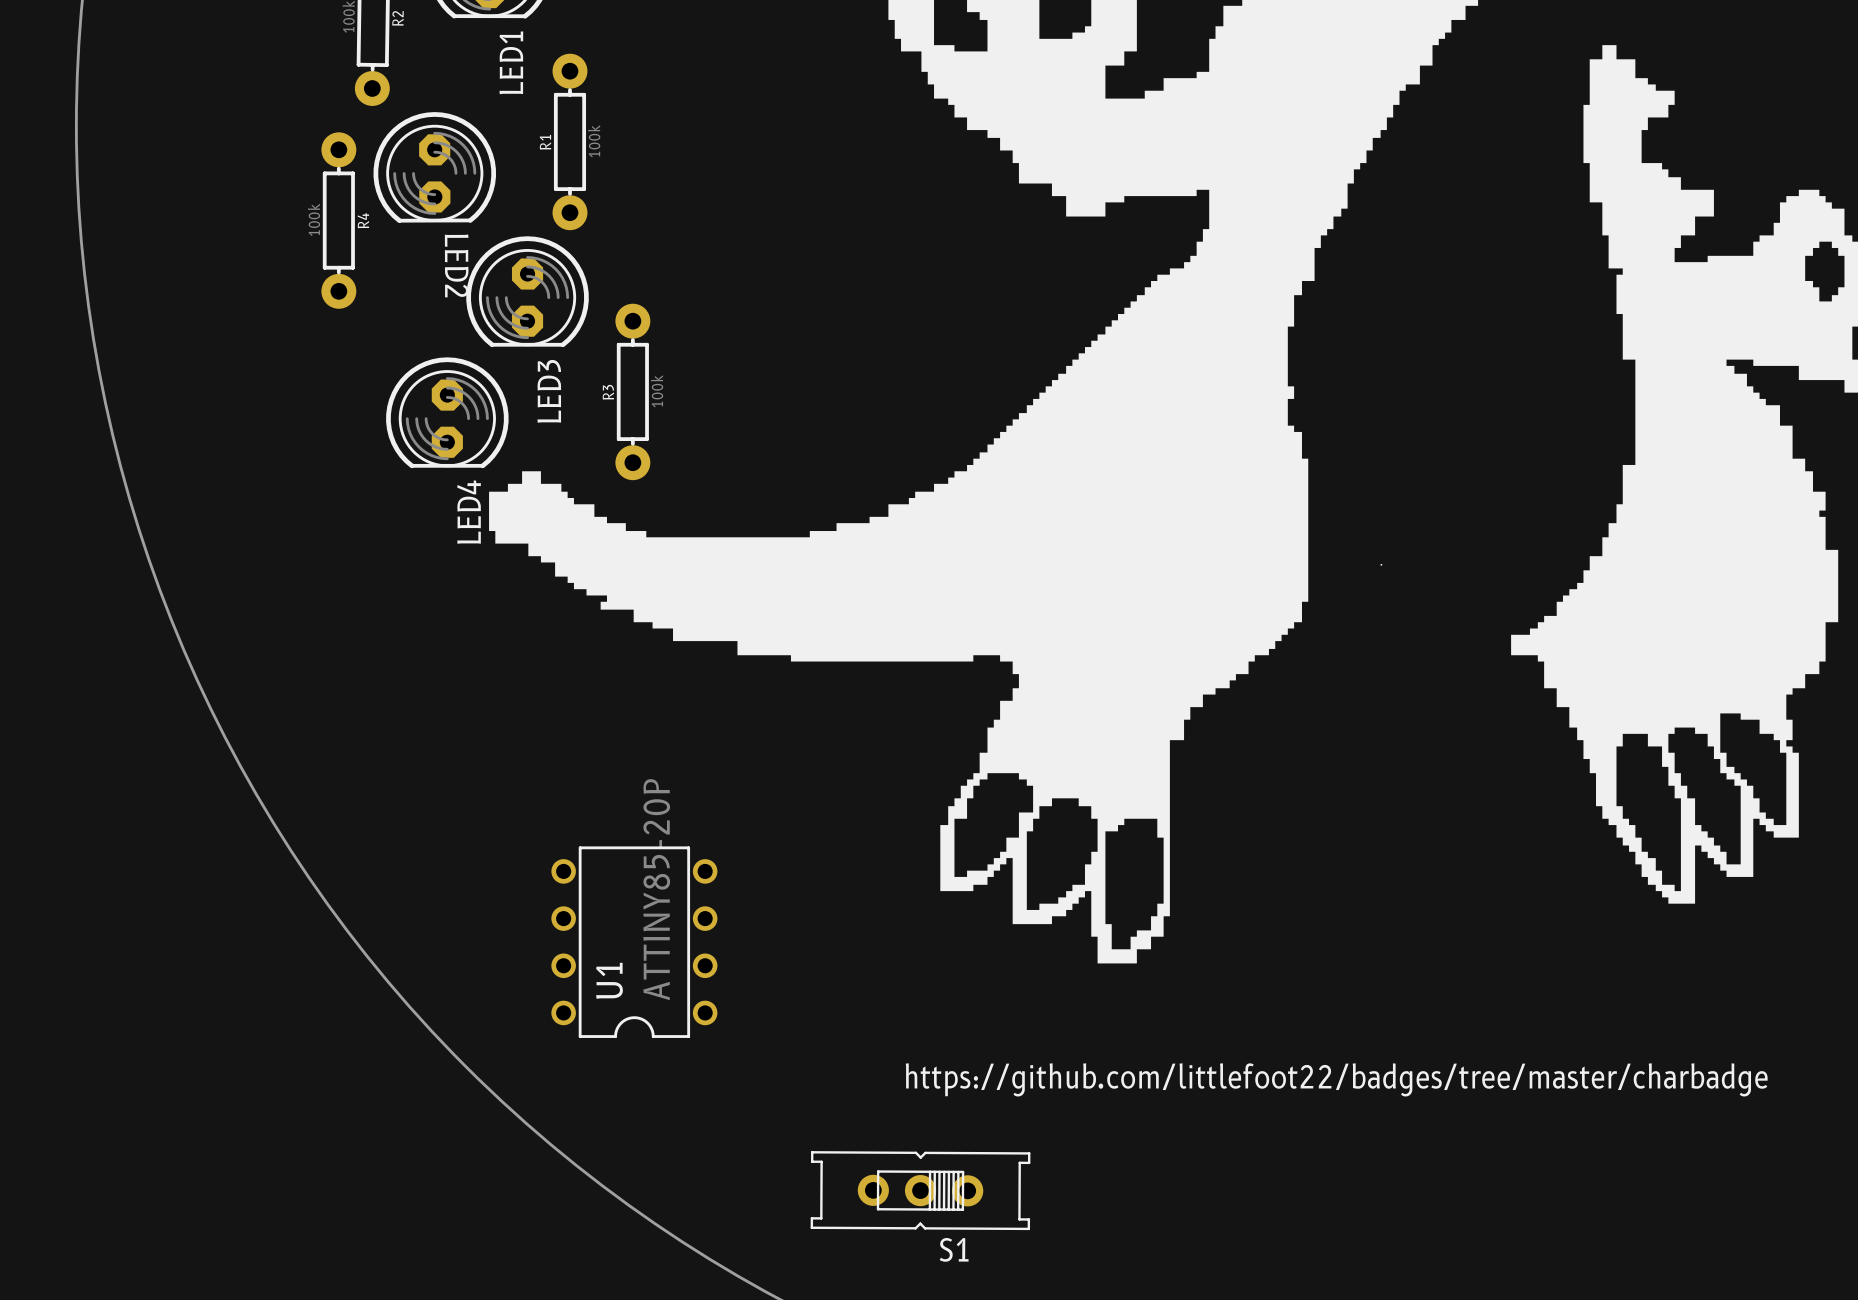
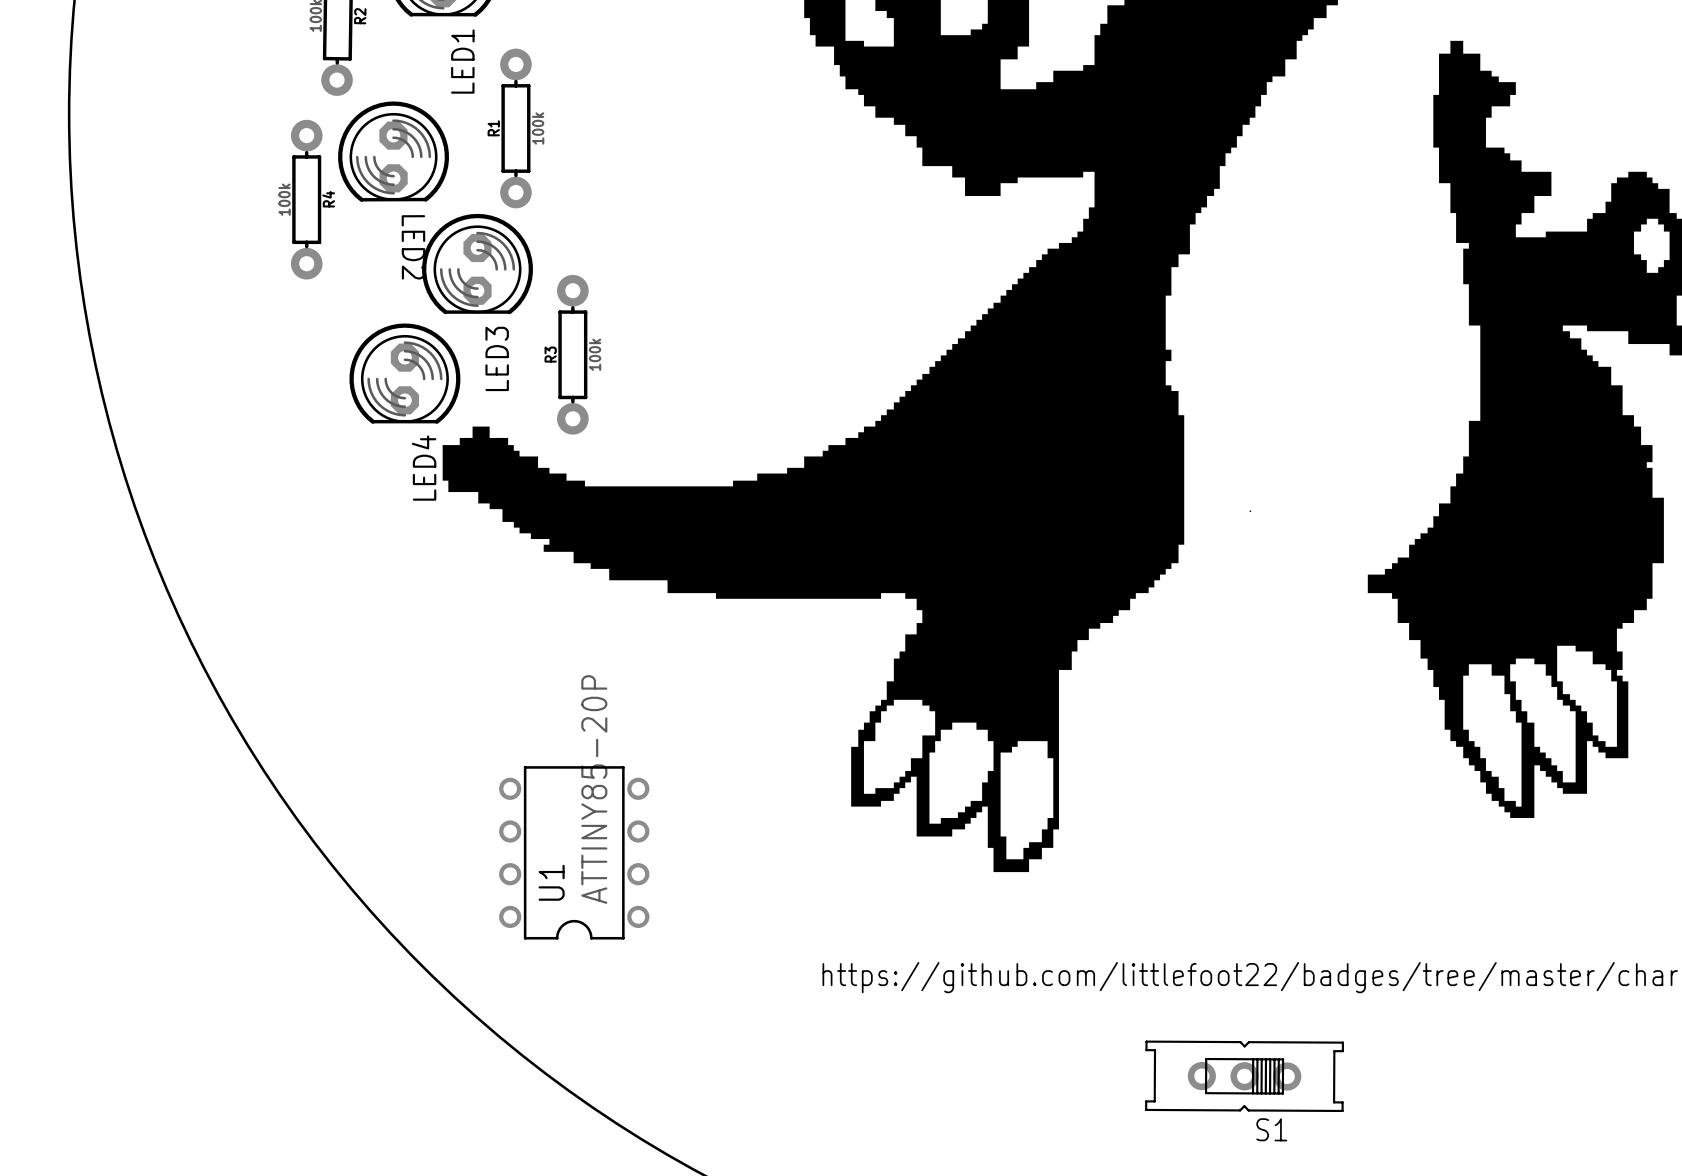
S1 position: (920, 1190) -> (1244, 1076)

